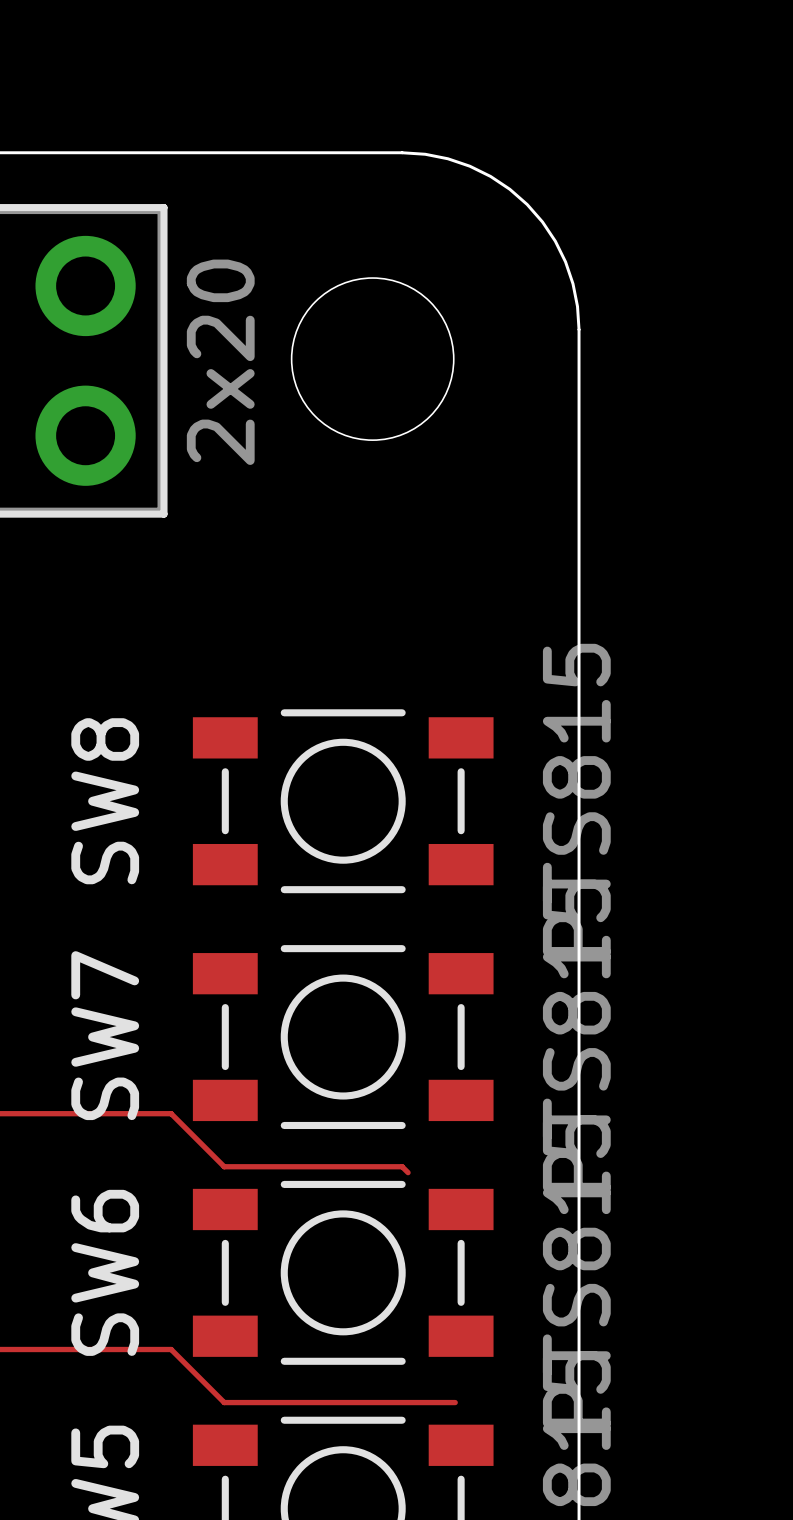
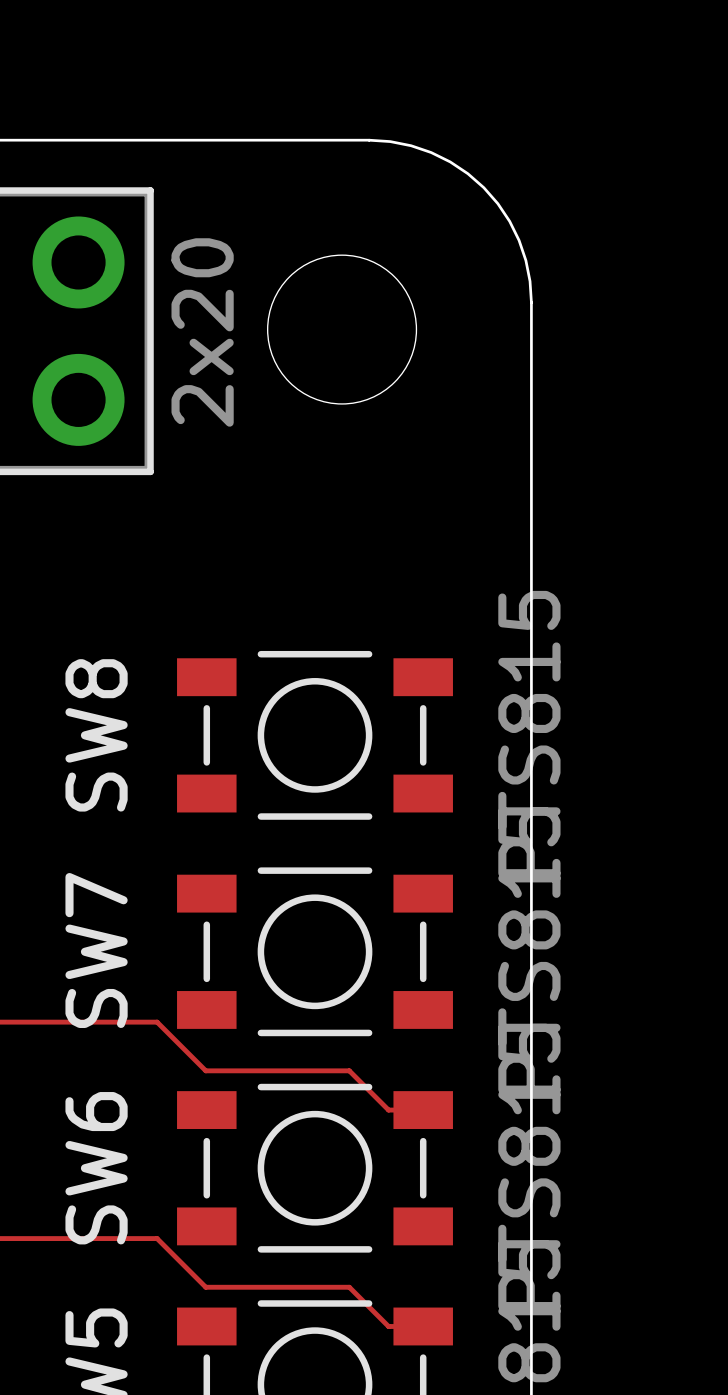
top track: (380, 1166) (402, 1166) (408, 1172) -> (349, 1070) (388, 1110) (423, 1110)
top track: (380, 1402) (455, 1402) -> (349, 1287) (388, 1326) (423, 1326)

